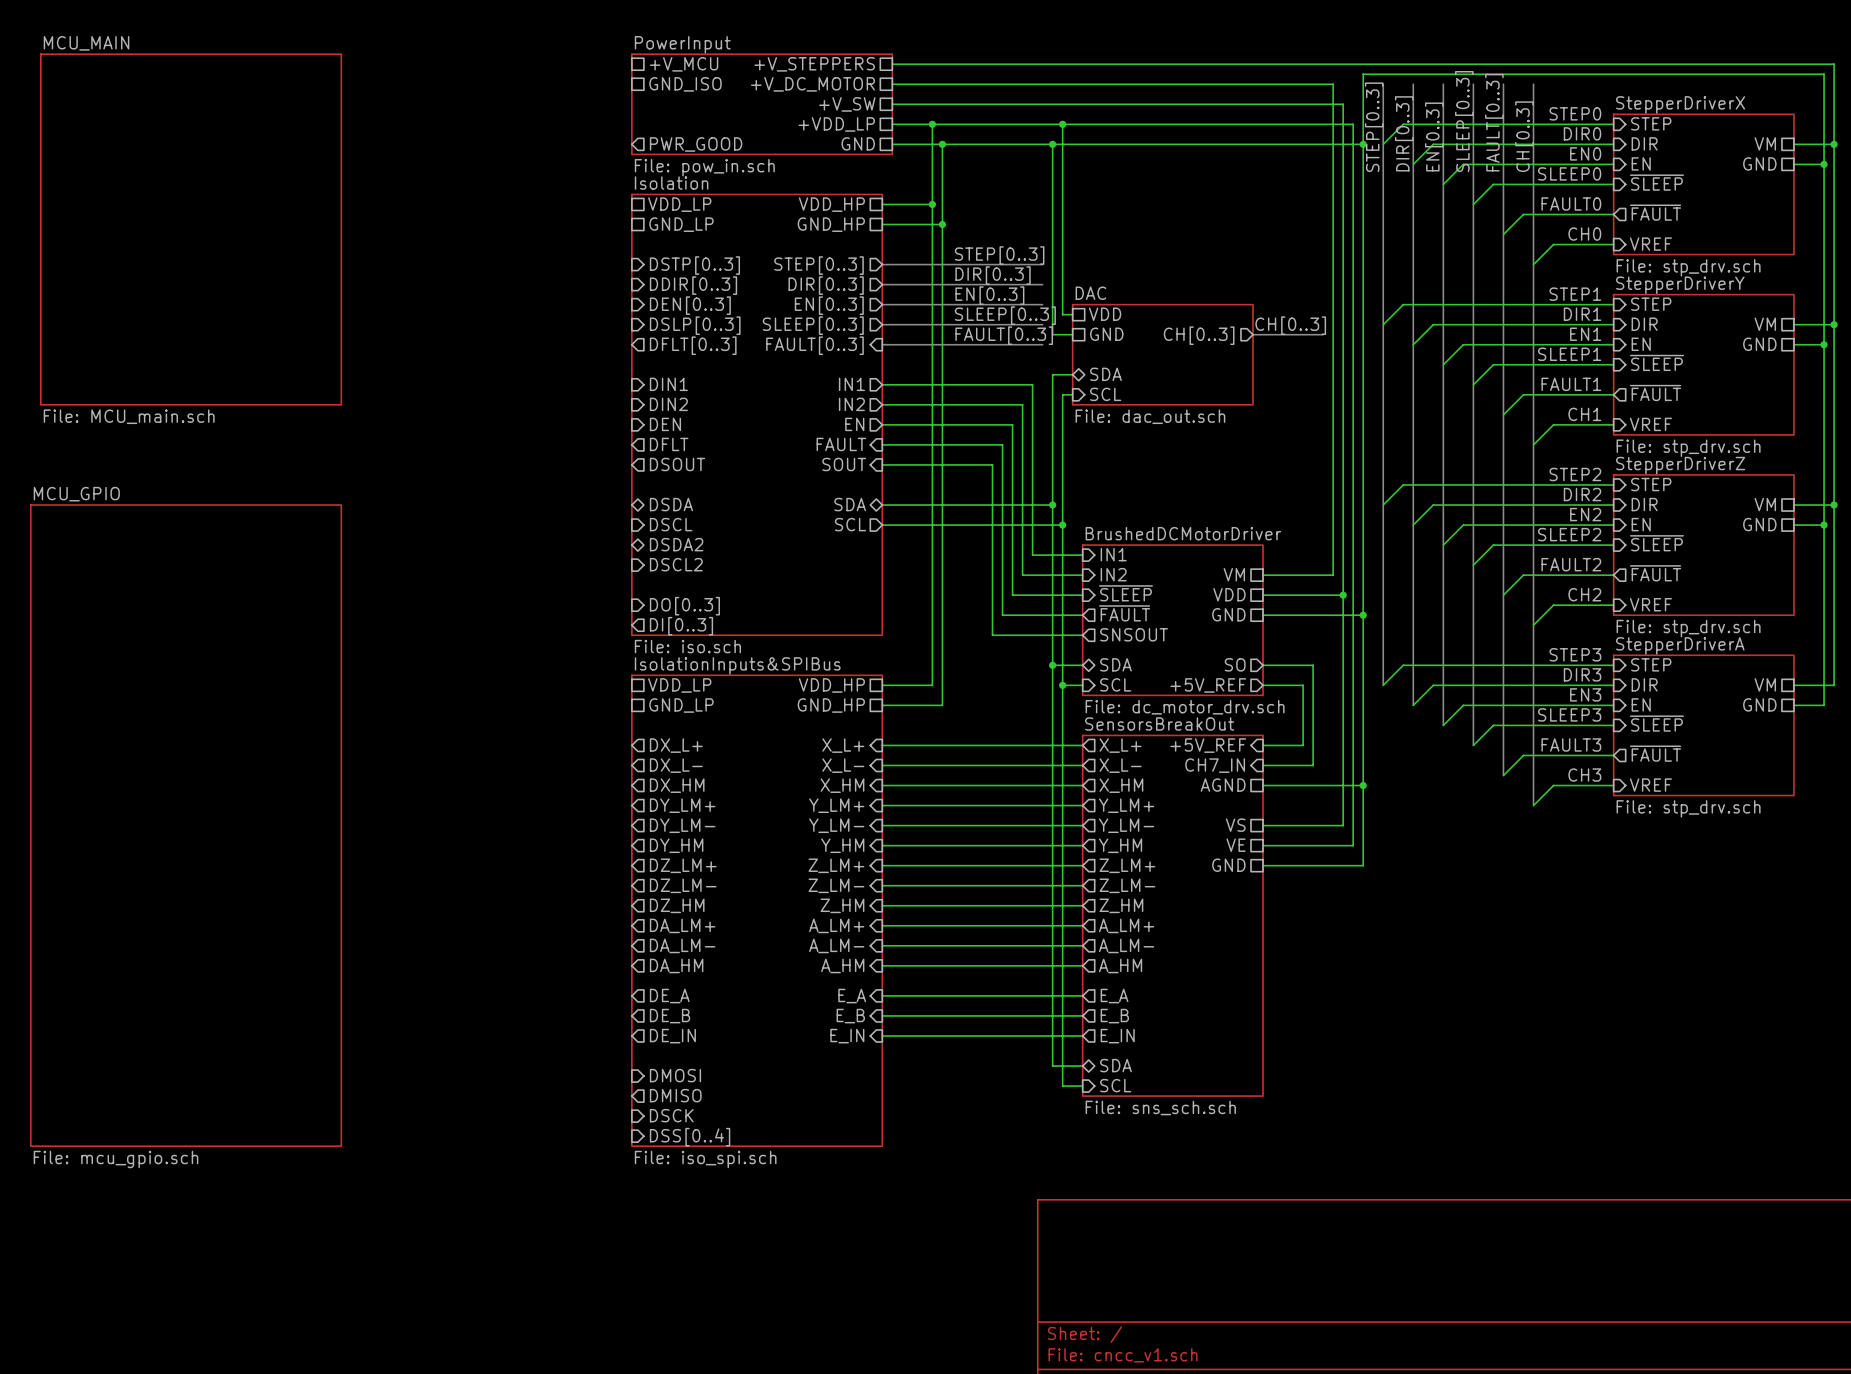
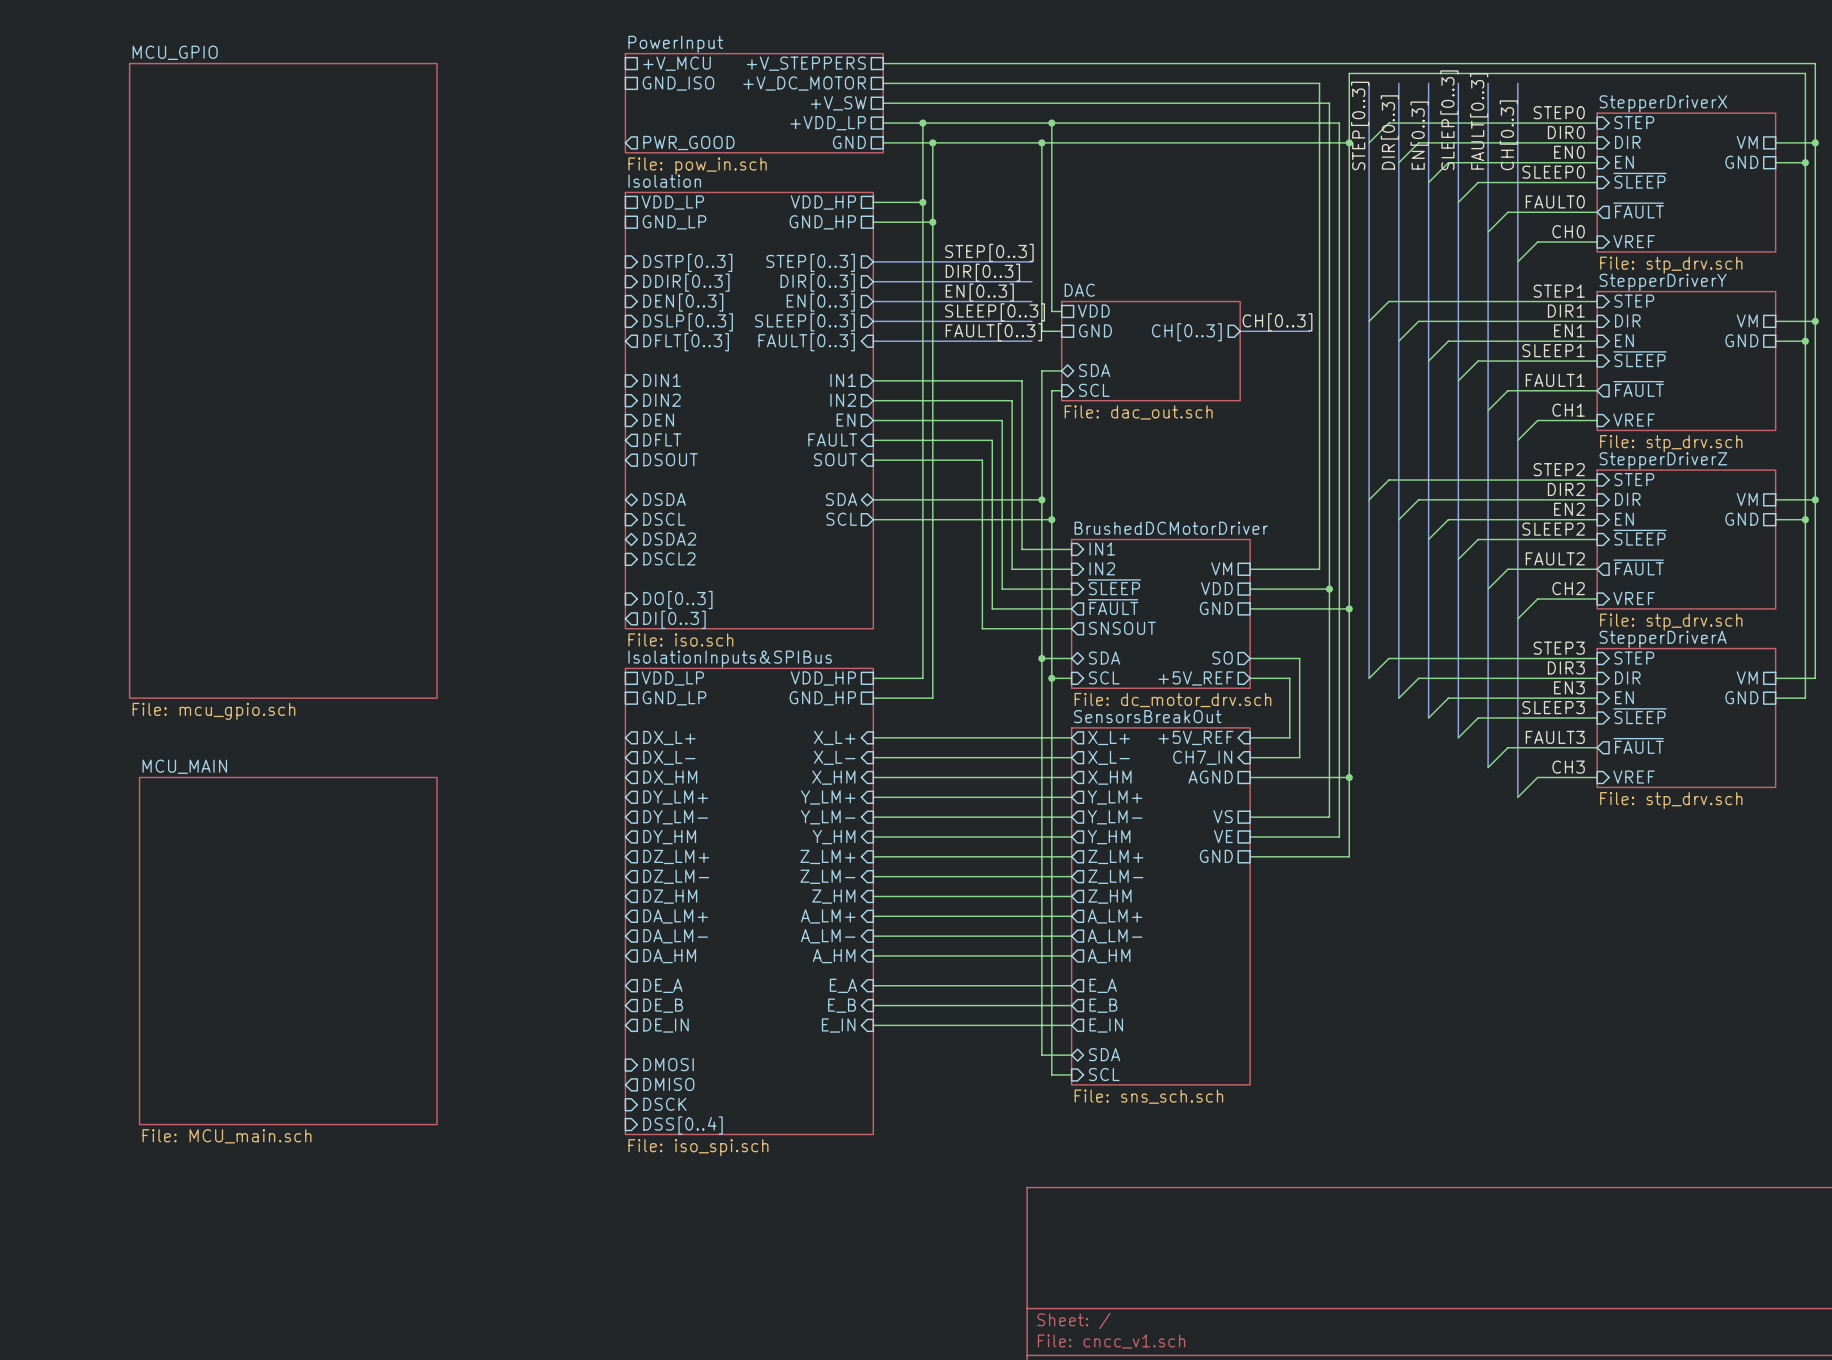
sheet MCU_MAIN: File: MCU_main.sch (191, 229) -> none
sheet MCU_GPIO: none -> File: mcu_gpio.sch (283, 380)
sheet MCU_GPIO: File: mcu_gpio.sch (186, 825) -> none
sheet MCU_MAIN: none -> File: MCU_main.sch (288, 951)

